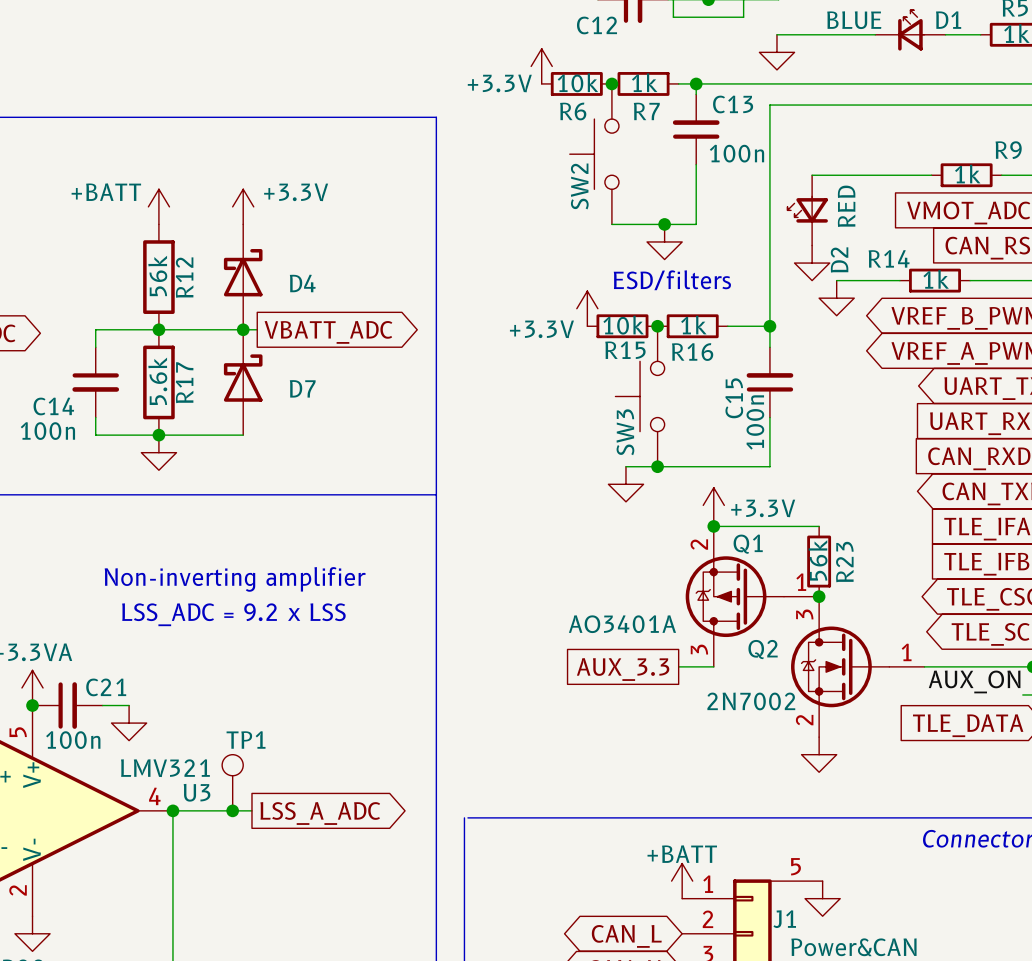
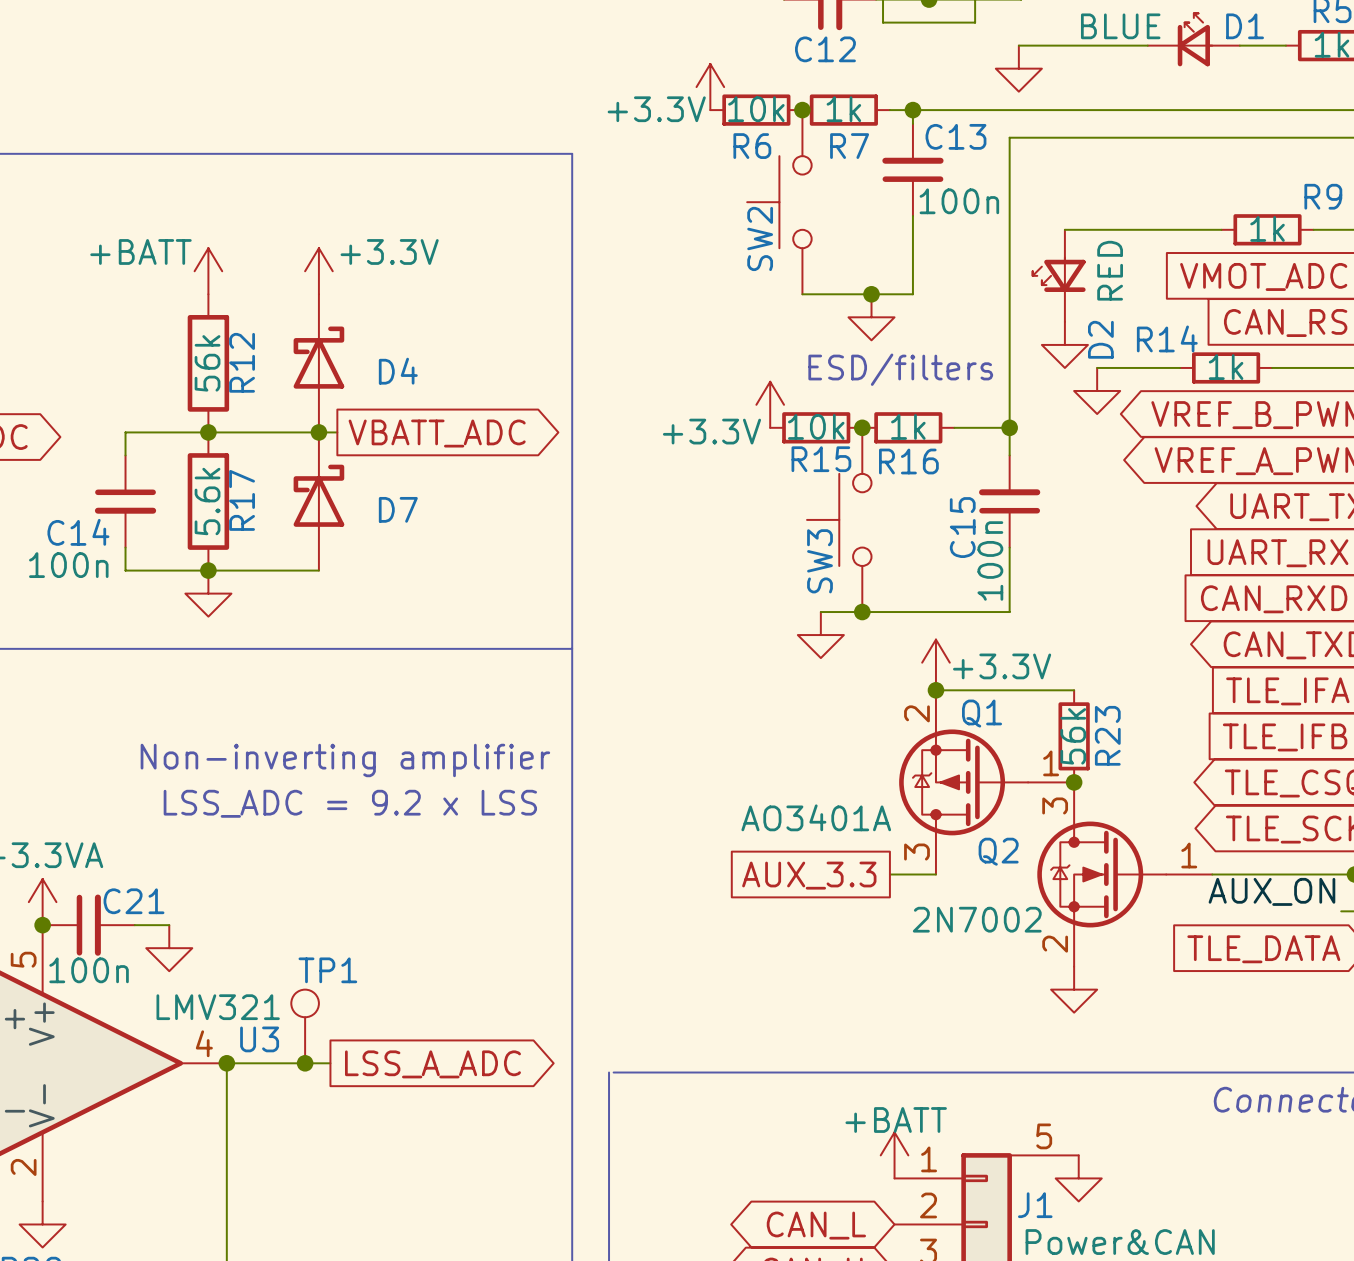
C12 name position: C12 (596, 25) -> C12 (825, 49)

